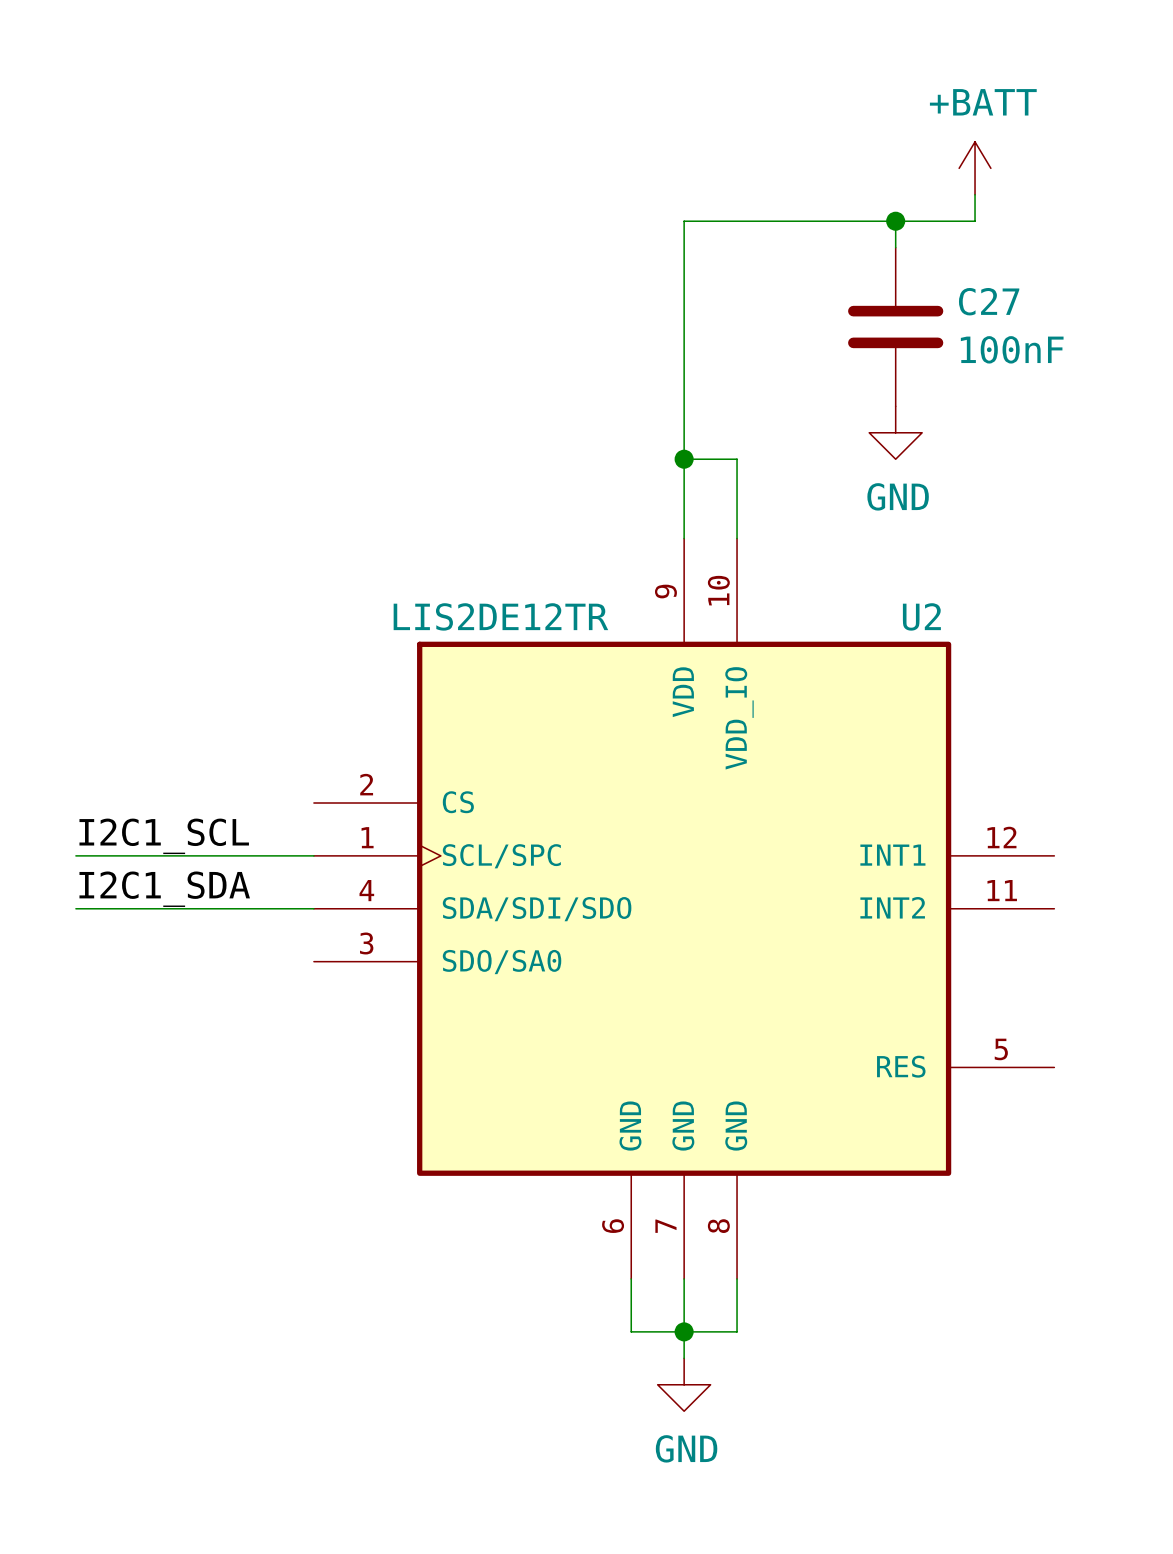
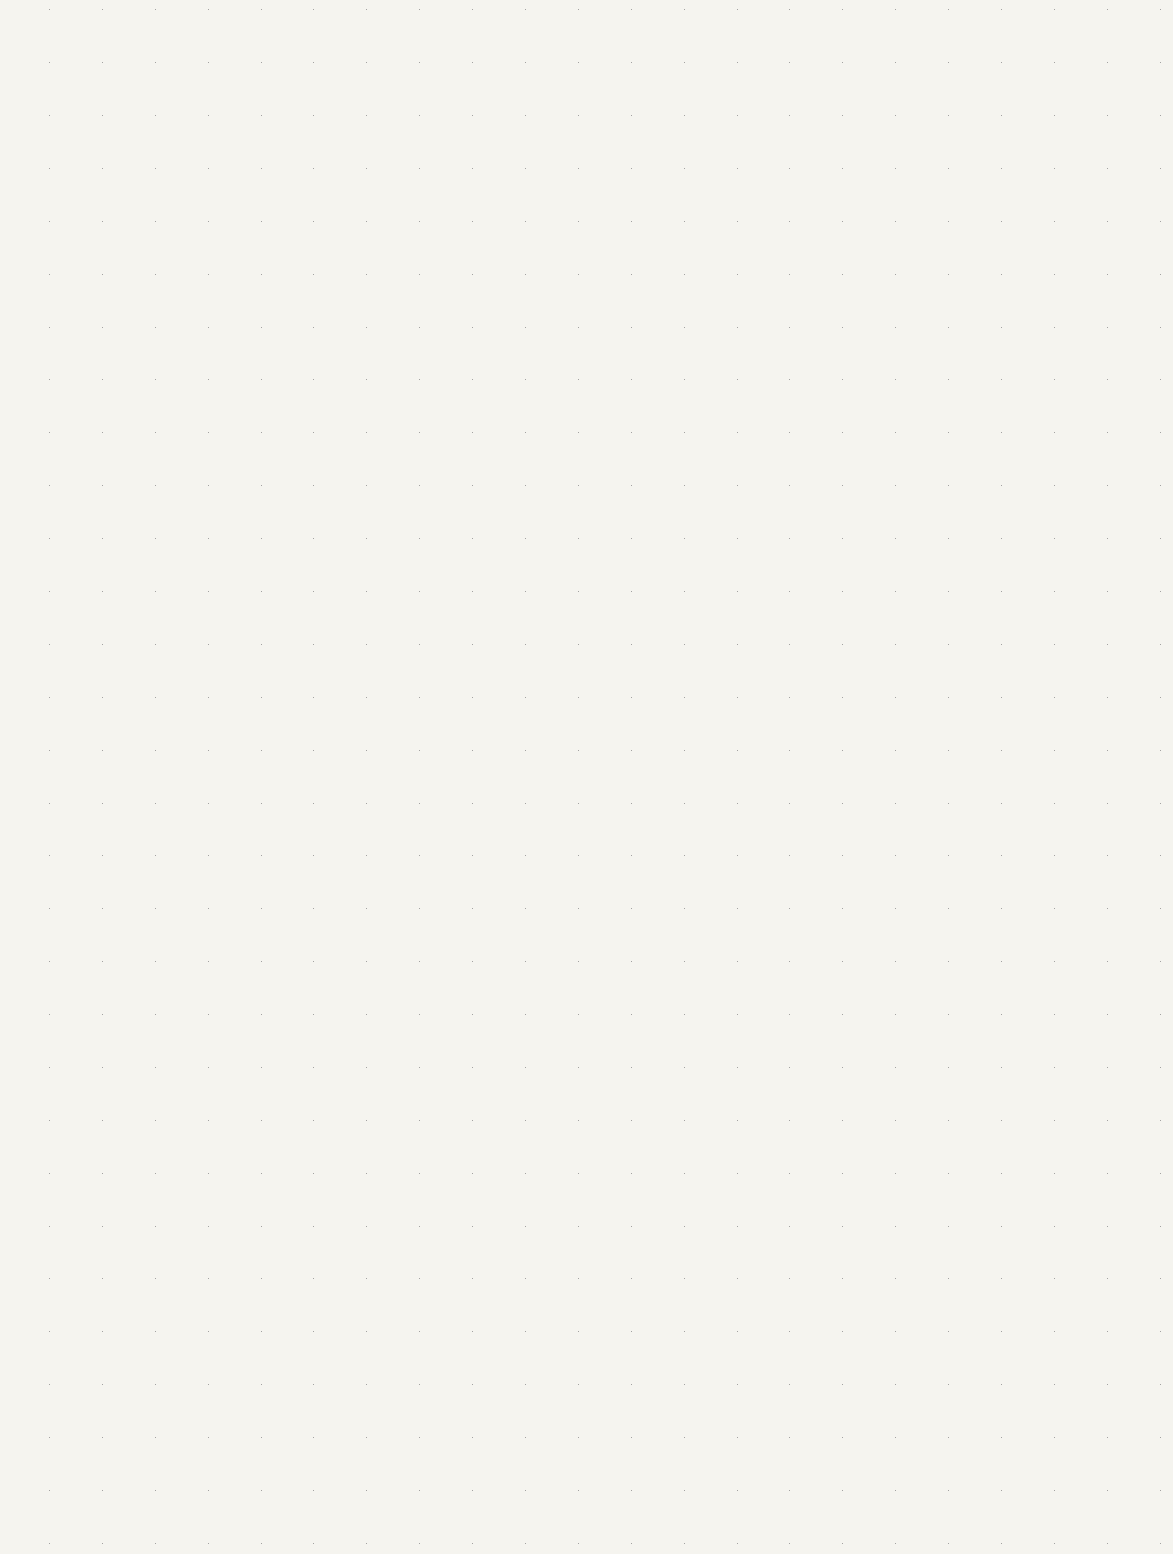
power symbol: +BATT (975, 168) -> none
wire: (975, 194) (975, 221) (684, 221) (684, 538) -> none
wire: (895, 221) (895, 247) -> none
junction: (895, 221) -> none
C27: 100nF (895, 327) -> none
power symbol: GND (895, 432) -> none
wire: (684, 459) (737, 459) (737, 538) -> none
junction: (684, 459) -> none
label: I2C1_SCL (164, 836) -> none
wire: (75, 855) (313, 855) -> none
label: I2C1_SDA (164, 889) -> none
wire: (75, 908) (313, 908) -> none
U2: LIS2DE12TR (684, 908) -> none
wire: (631, 1278) (631, 1331) (737, 1331) (737, 1278) -> none
wire: (684, 1278) (684, 1358) -> none
junction: (684, 1331) -> none
power symbol: GND (684, 1384) -> none

